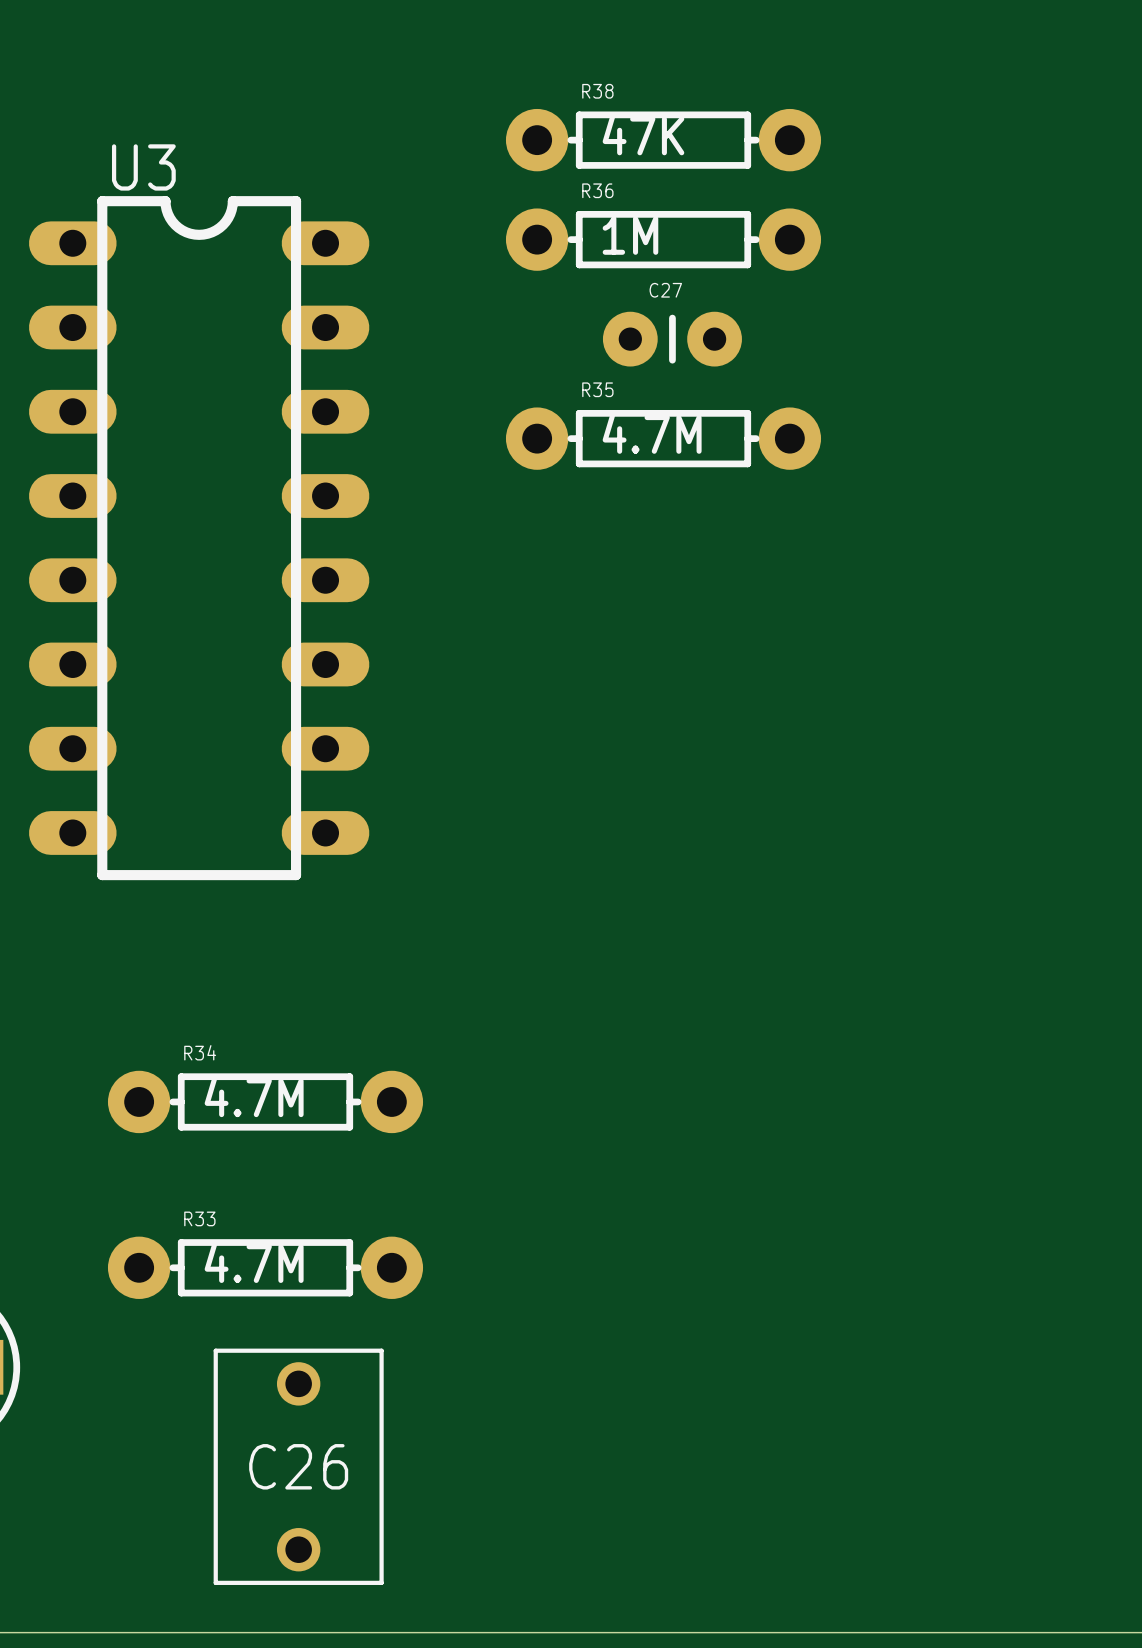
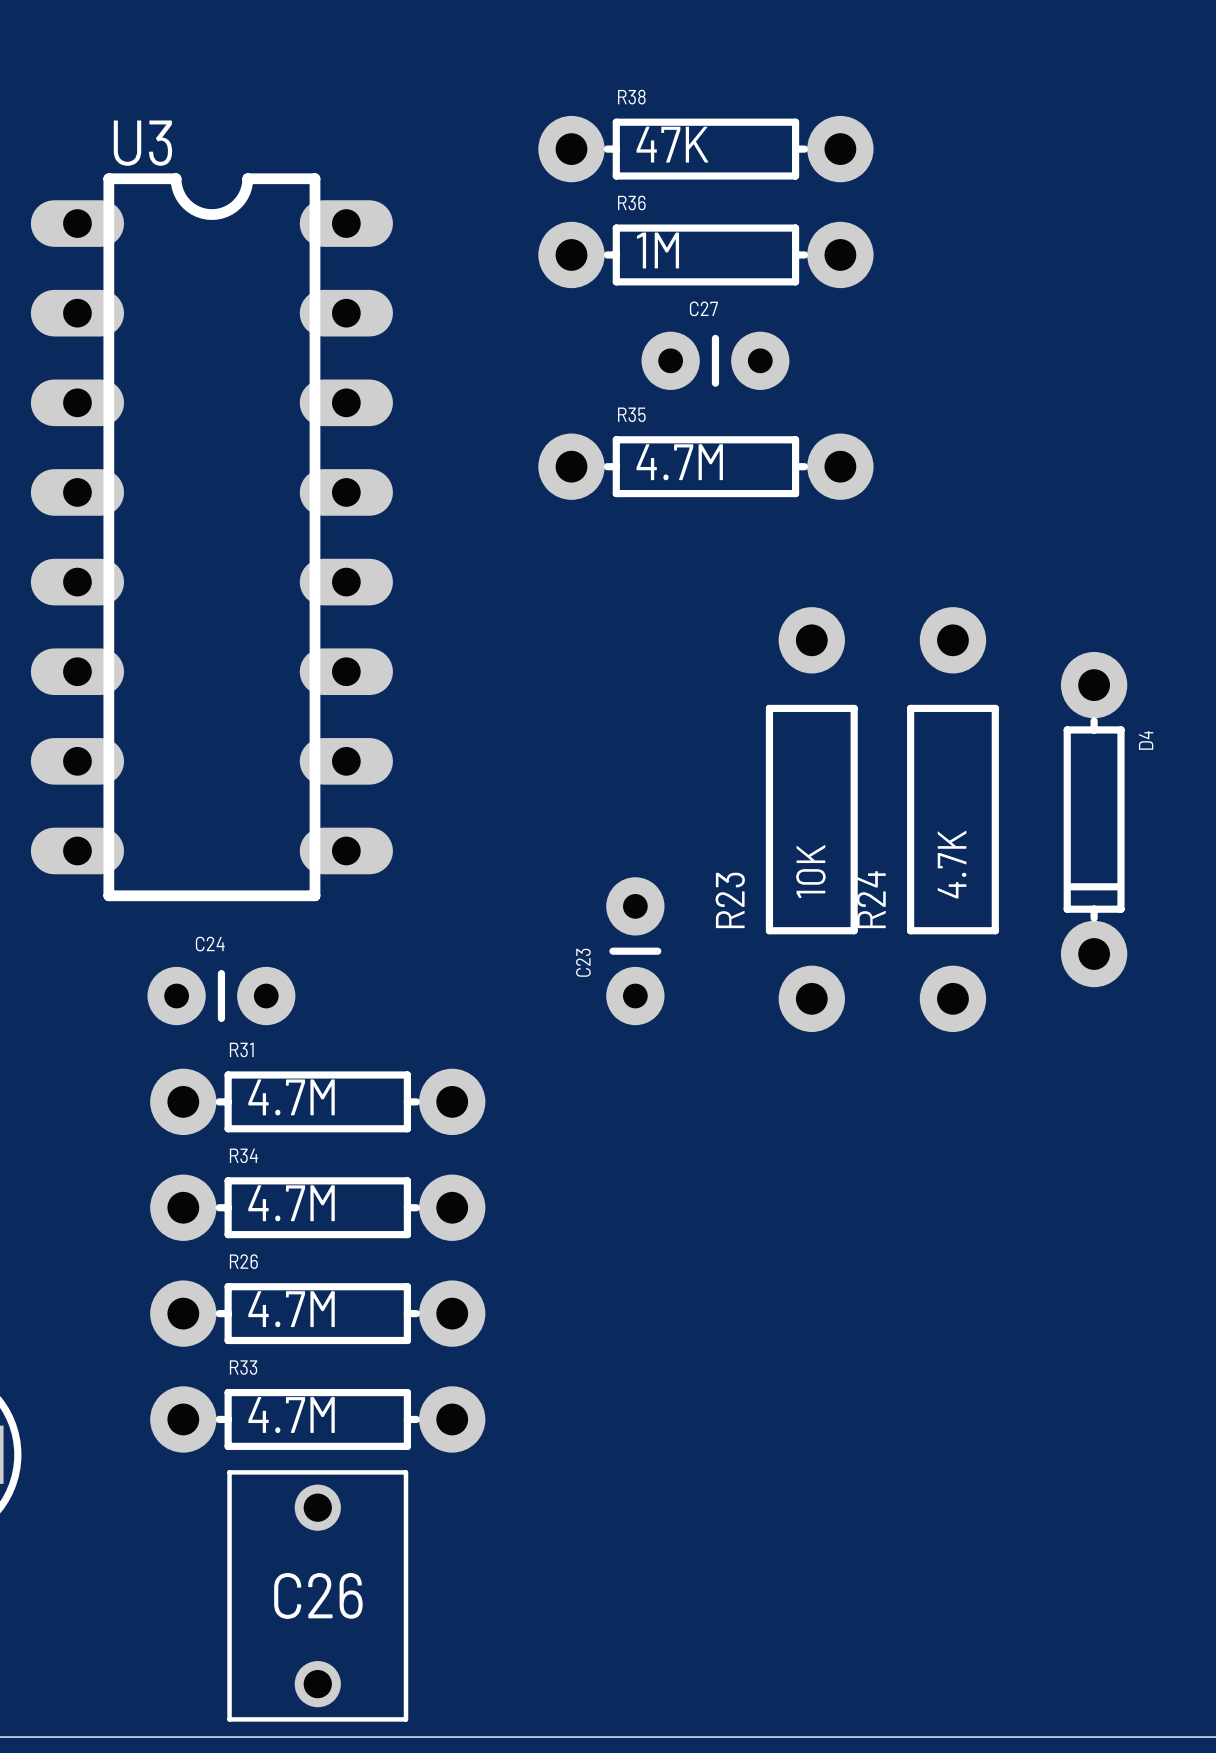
U3 position: (199, 538) -> (211, 537)
R23: none -> 10K (811, 819)
R24: none -> 4.7K (952, 819)
D4: none -> (1094, 819)
C23: none -> (635, 951)
C24: none -> (221, 996)
R31: none -> 4.7M (317, 1101)
R34 position: (265, 1101) -> (317, 1207)
R26: none -> 4.7M (317, 1313)
R33 position: (265, 1267) -> (317, 1419)
C26 position: (298, 1466) -> (317, 1595)

